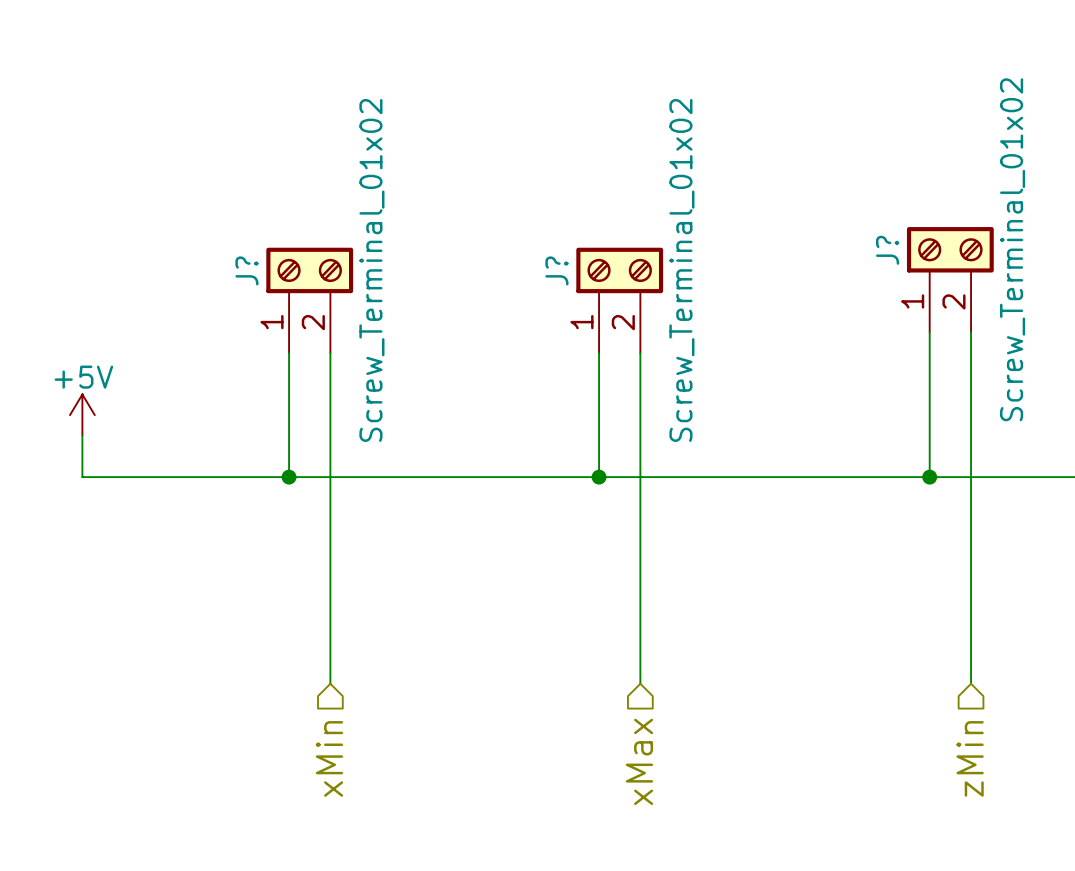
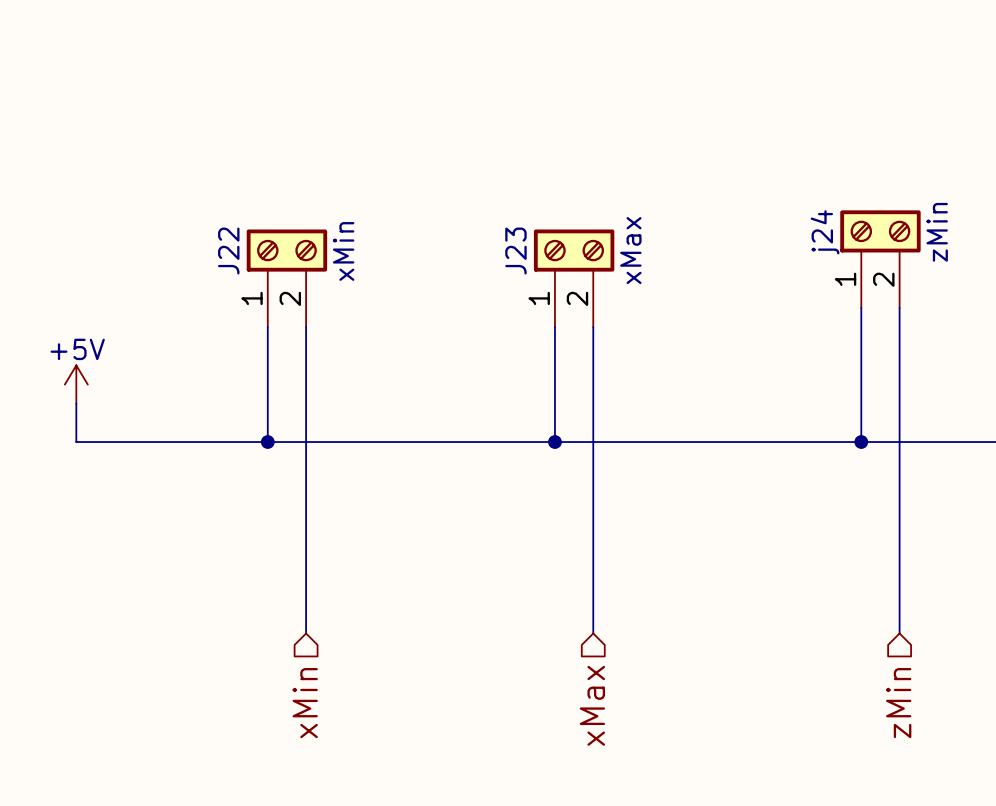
J? value: Screw_Terminal_01x02 (1012, 249) -> zMin (937, 232)
J? name: J? (887, 250) -> j24 (825, 232)
J? name: J? (246, 270) -> J22 (228, 251)
J? value: Screw_Terminal_01x02 (371, 270) -> xMin (343, 251)
J? name: J? (556, 270) -> J23 (515, 251)
J? value: Screw_Terminal_01x02 (681, 270) -> xMax (630, 250)

